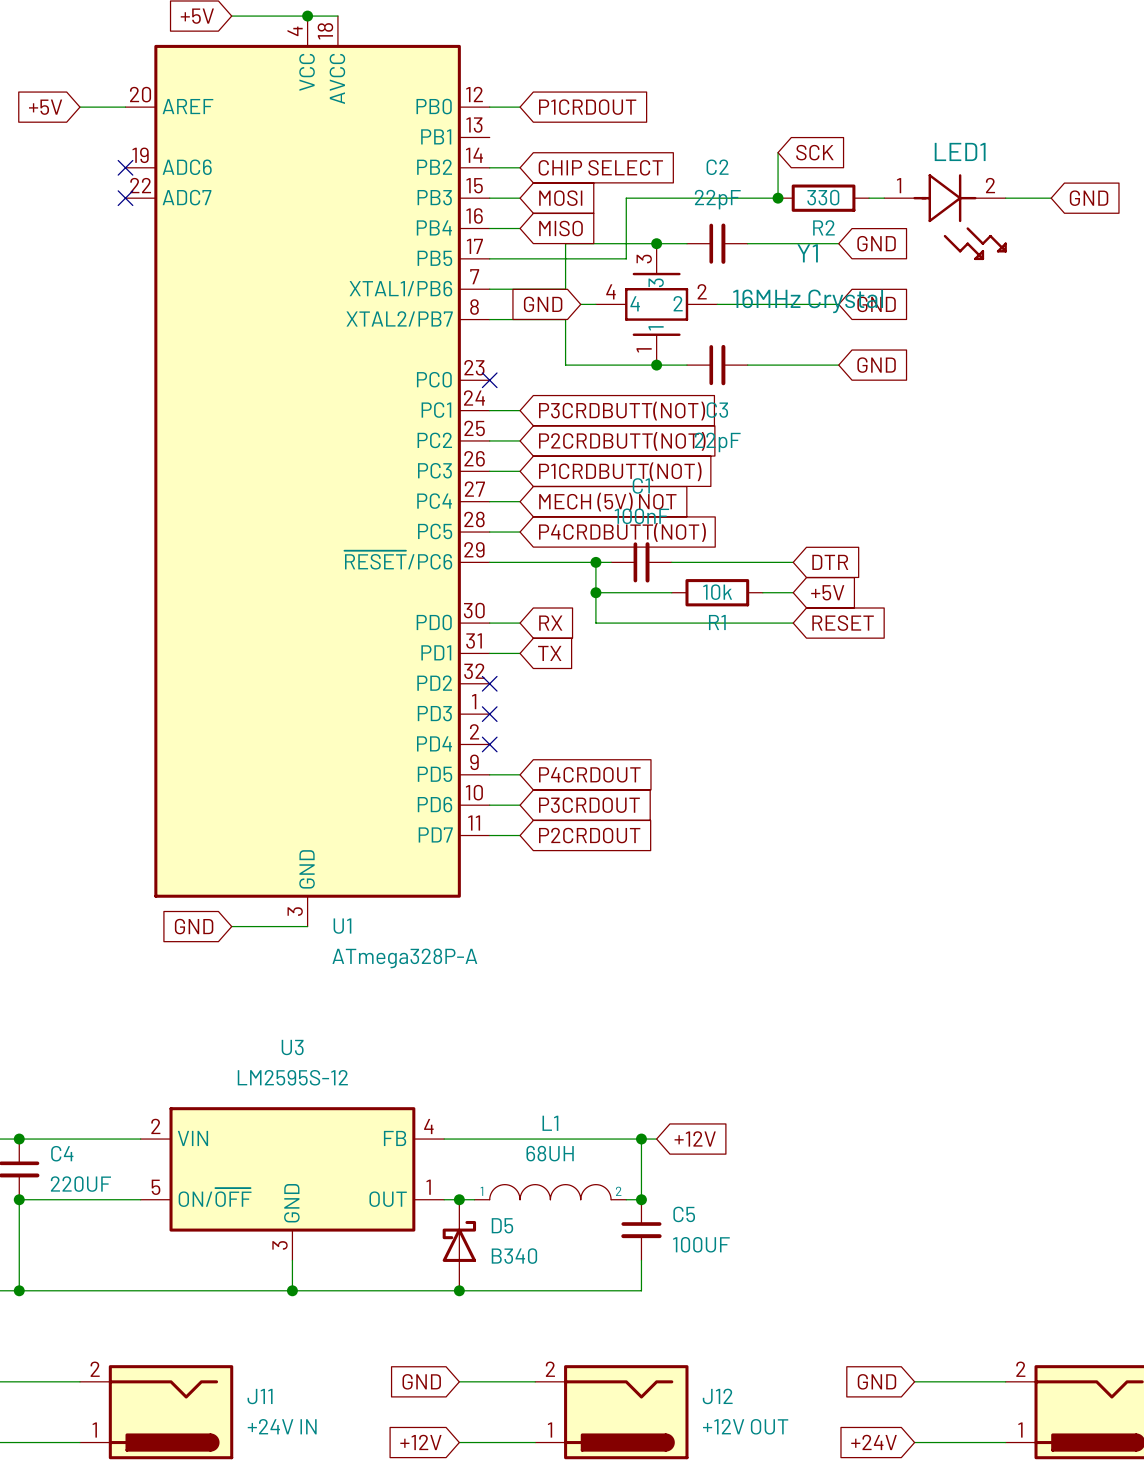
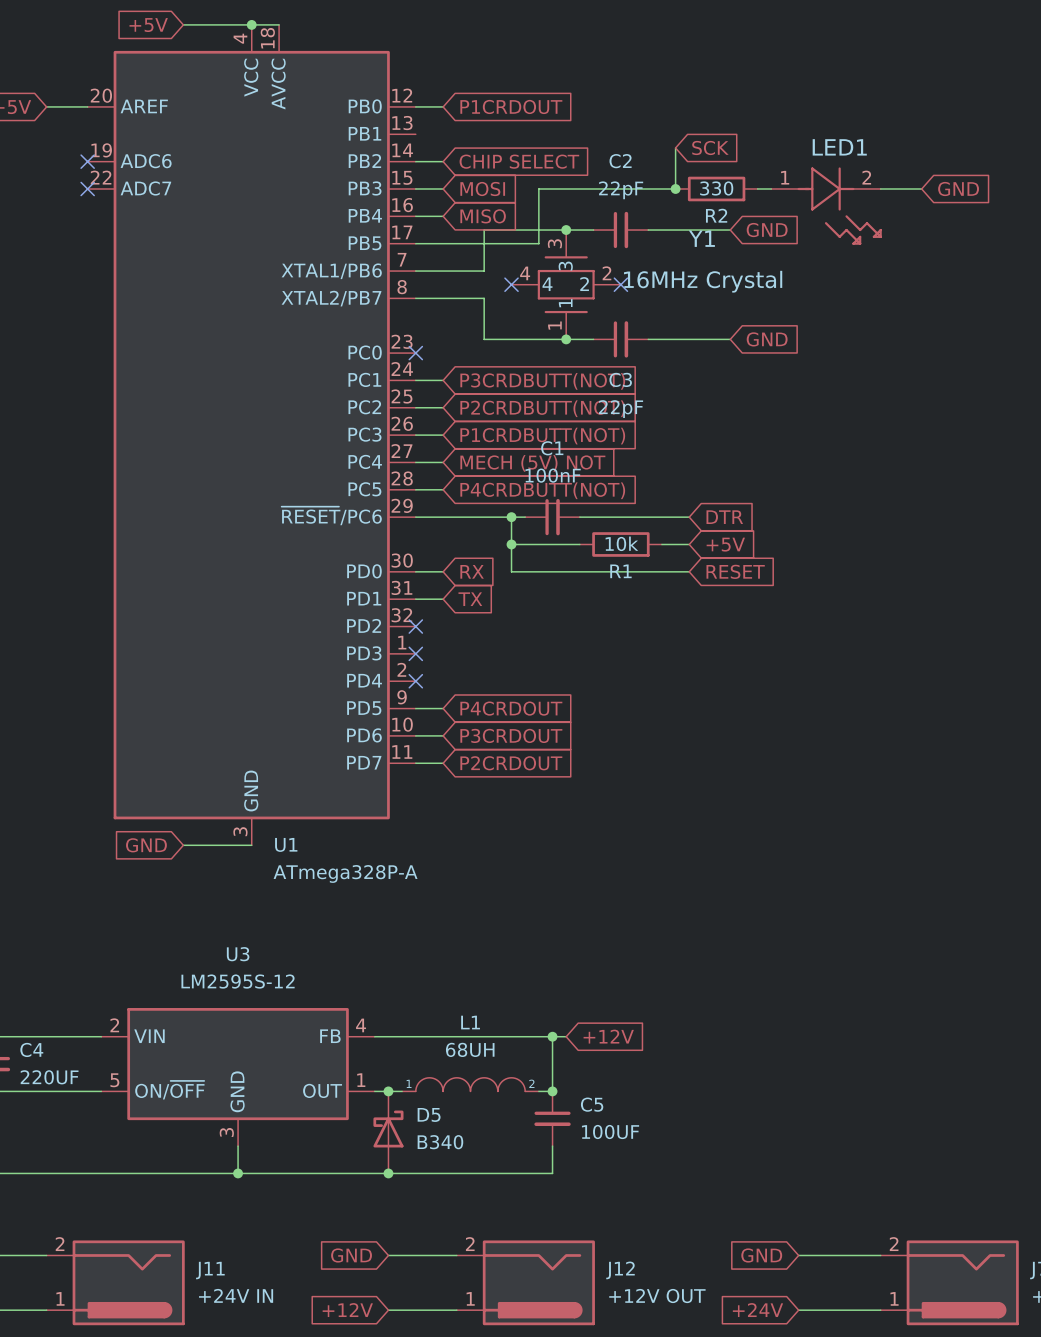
global label: GND (543, 304) -> none
wire: (580, 304) (595, 304) -> none
no-connect mark: none -> (511, 284)
wire: (717, 304) (838, 304) -> none
no-connect mark: none -> (620, 284)
global label: GND (876, 304) -> none

